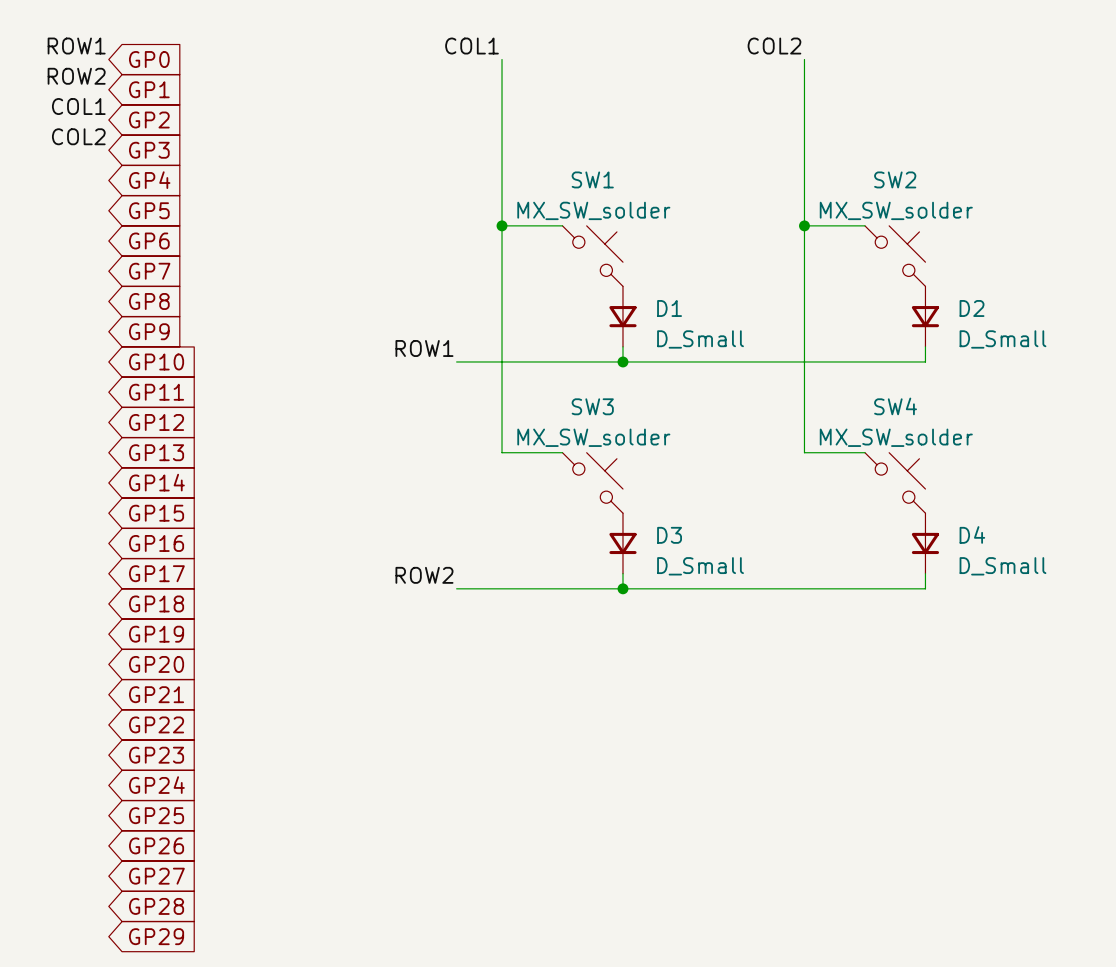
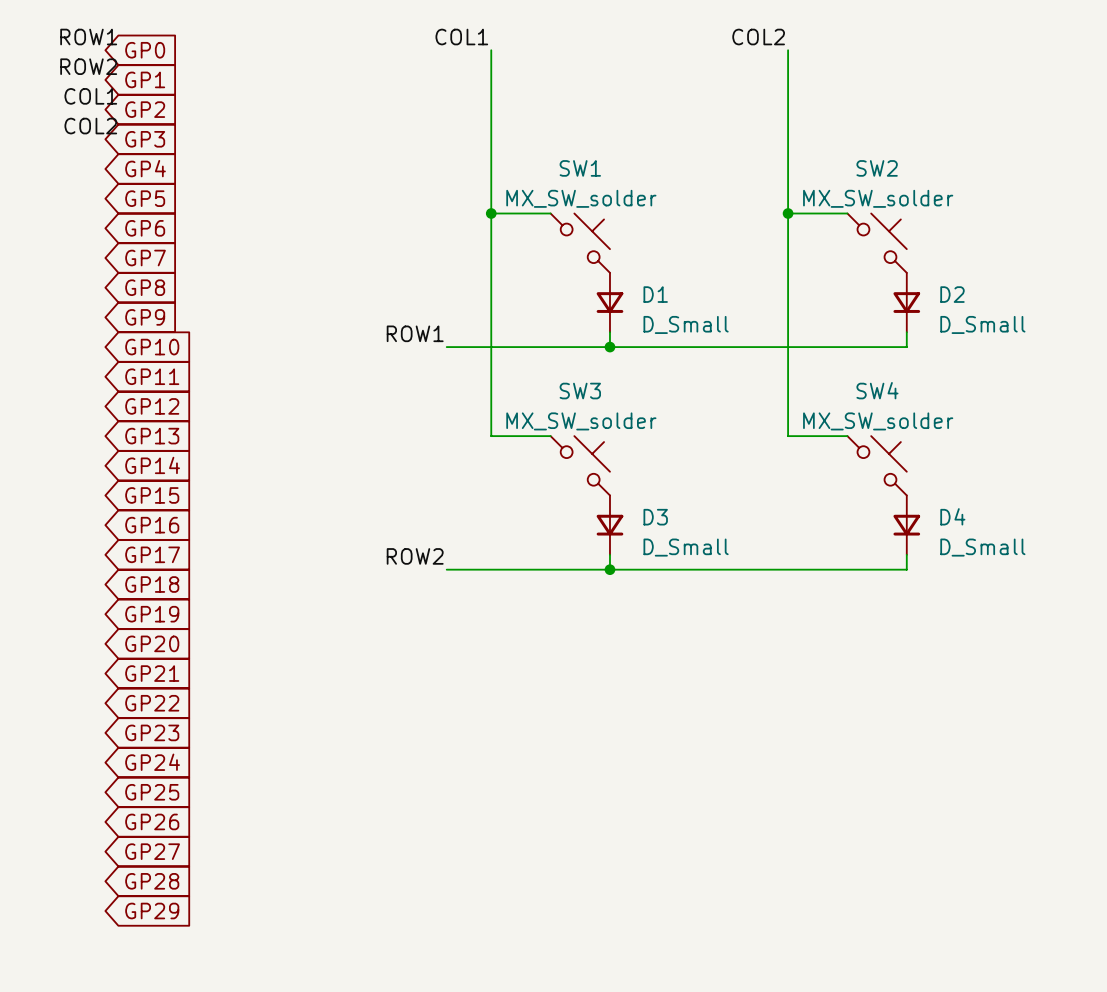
label position: ROW1 (76, 46) -> ROW1 (88, 37)
label position: ROW2 (76, 76) -> ROW2 (88, 66)
label position: COL1 (78, 106) -> COL1 (90, 96)
label position: COL2 (78, 136) -> COL2 (90, 126)

